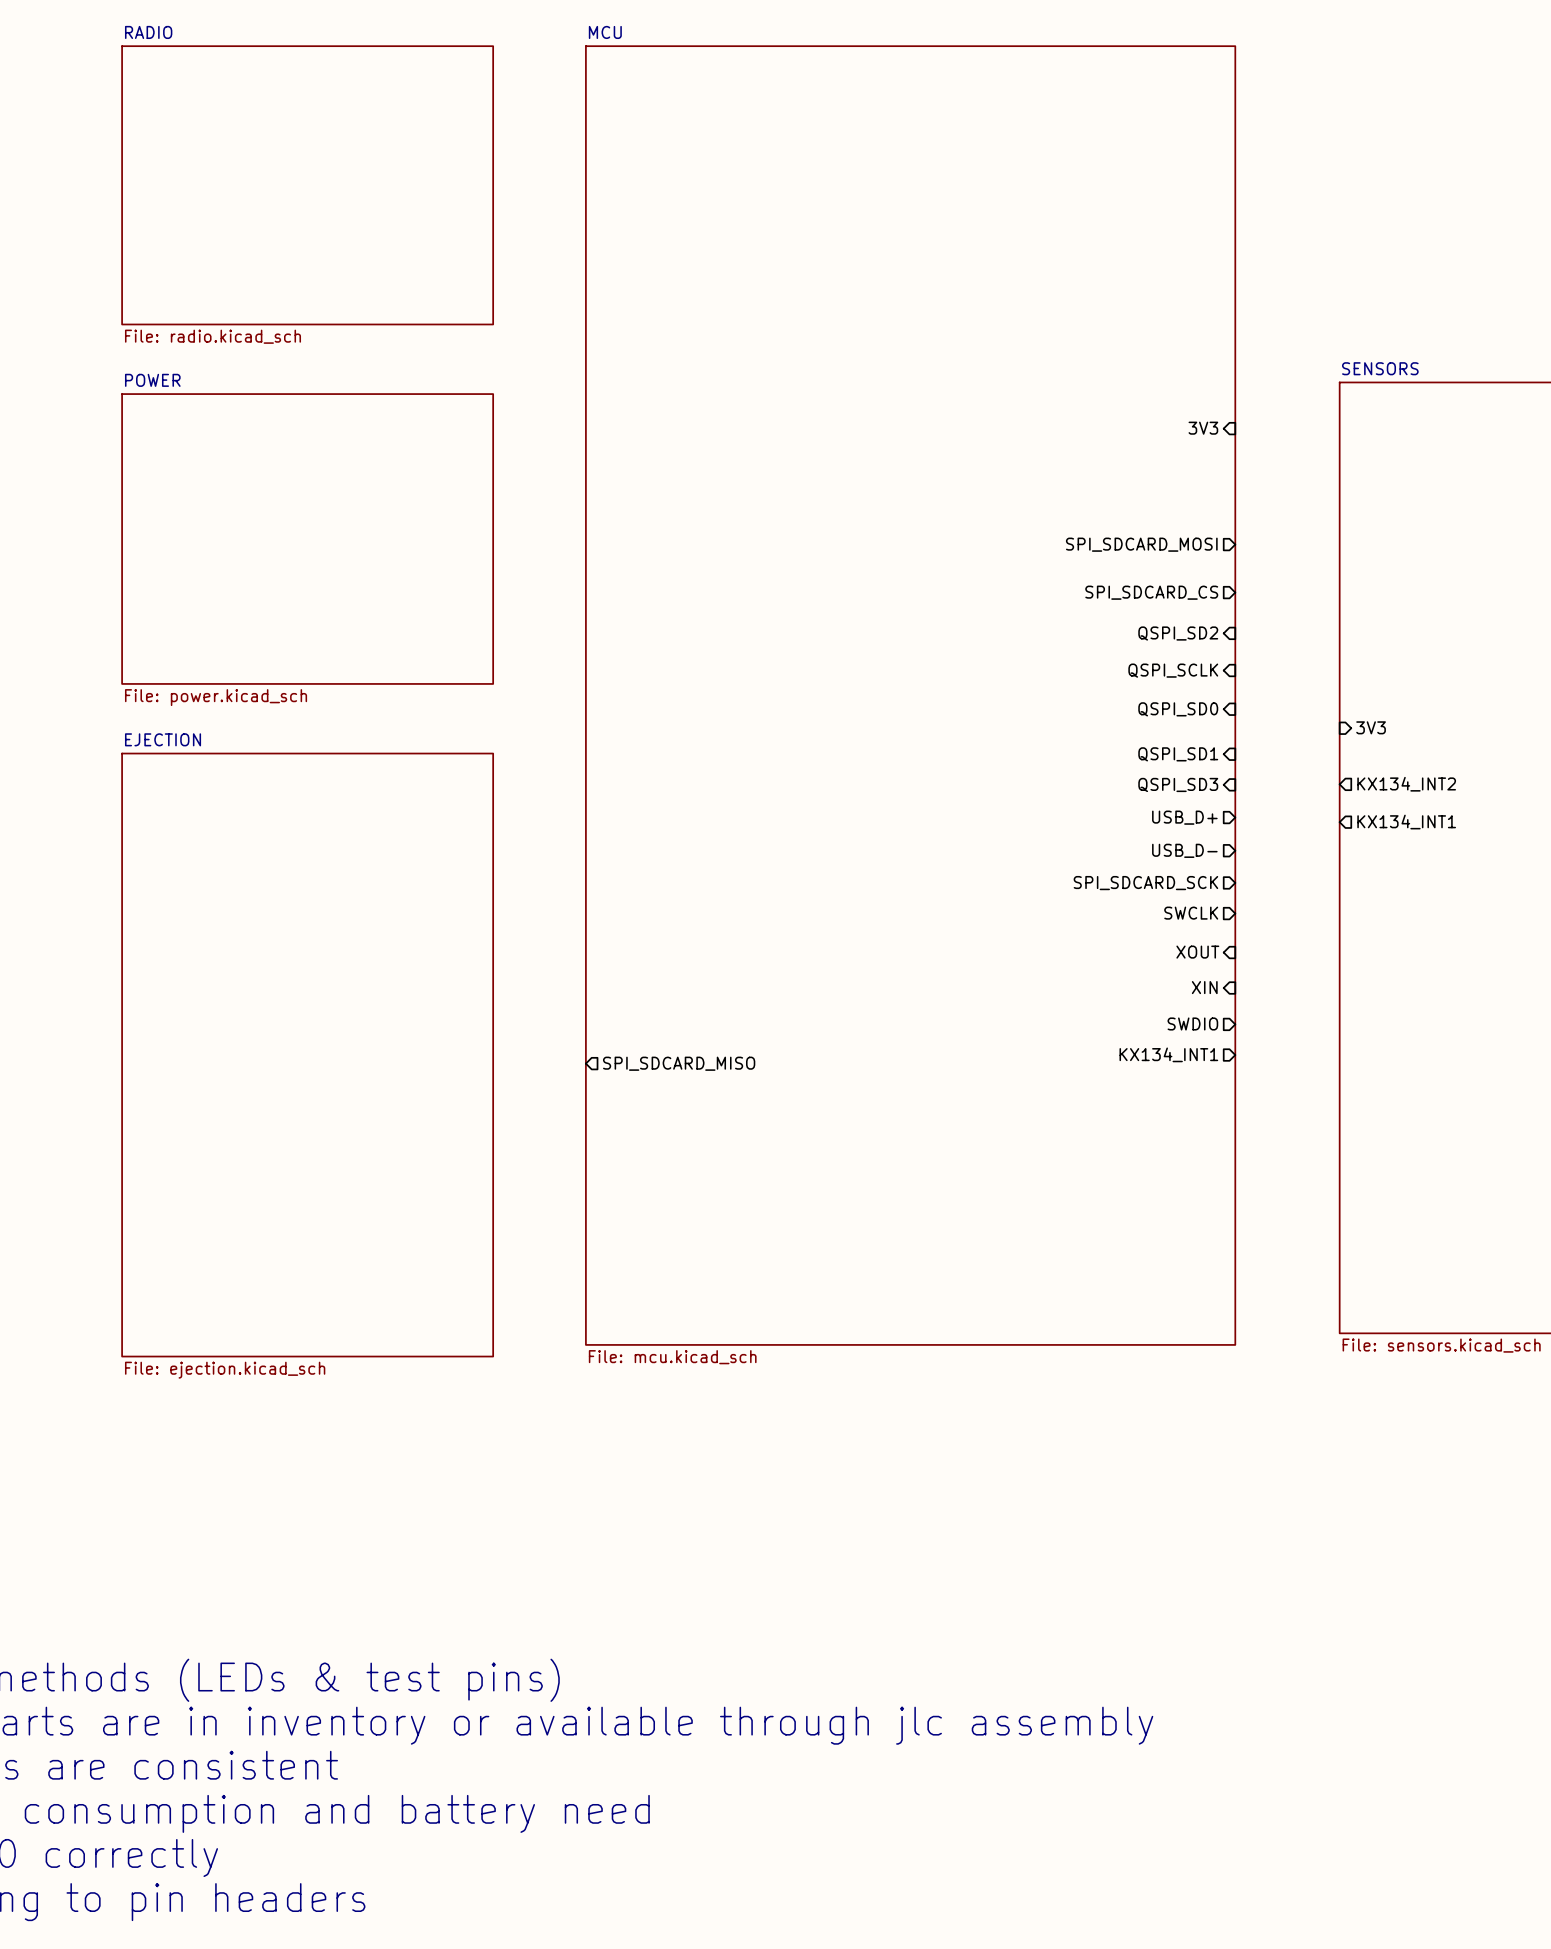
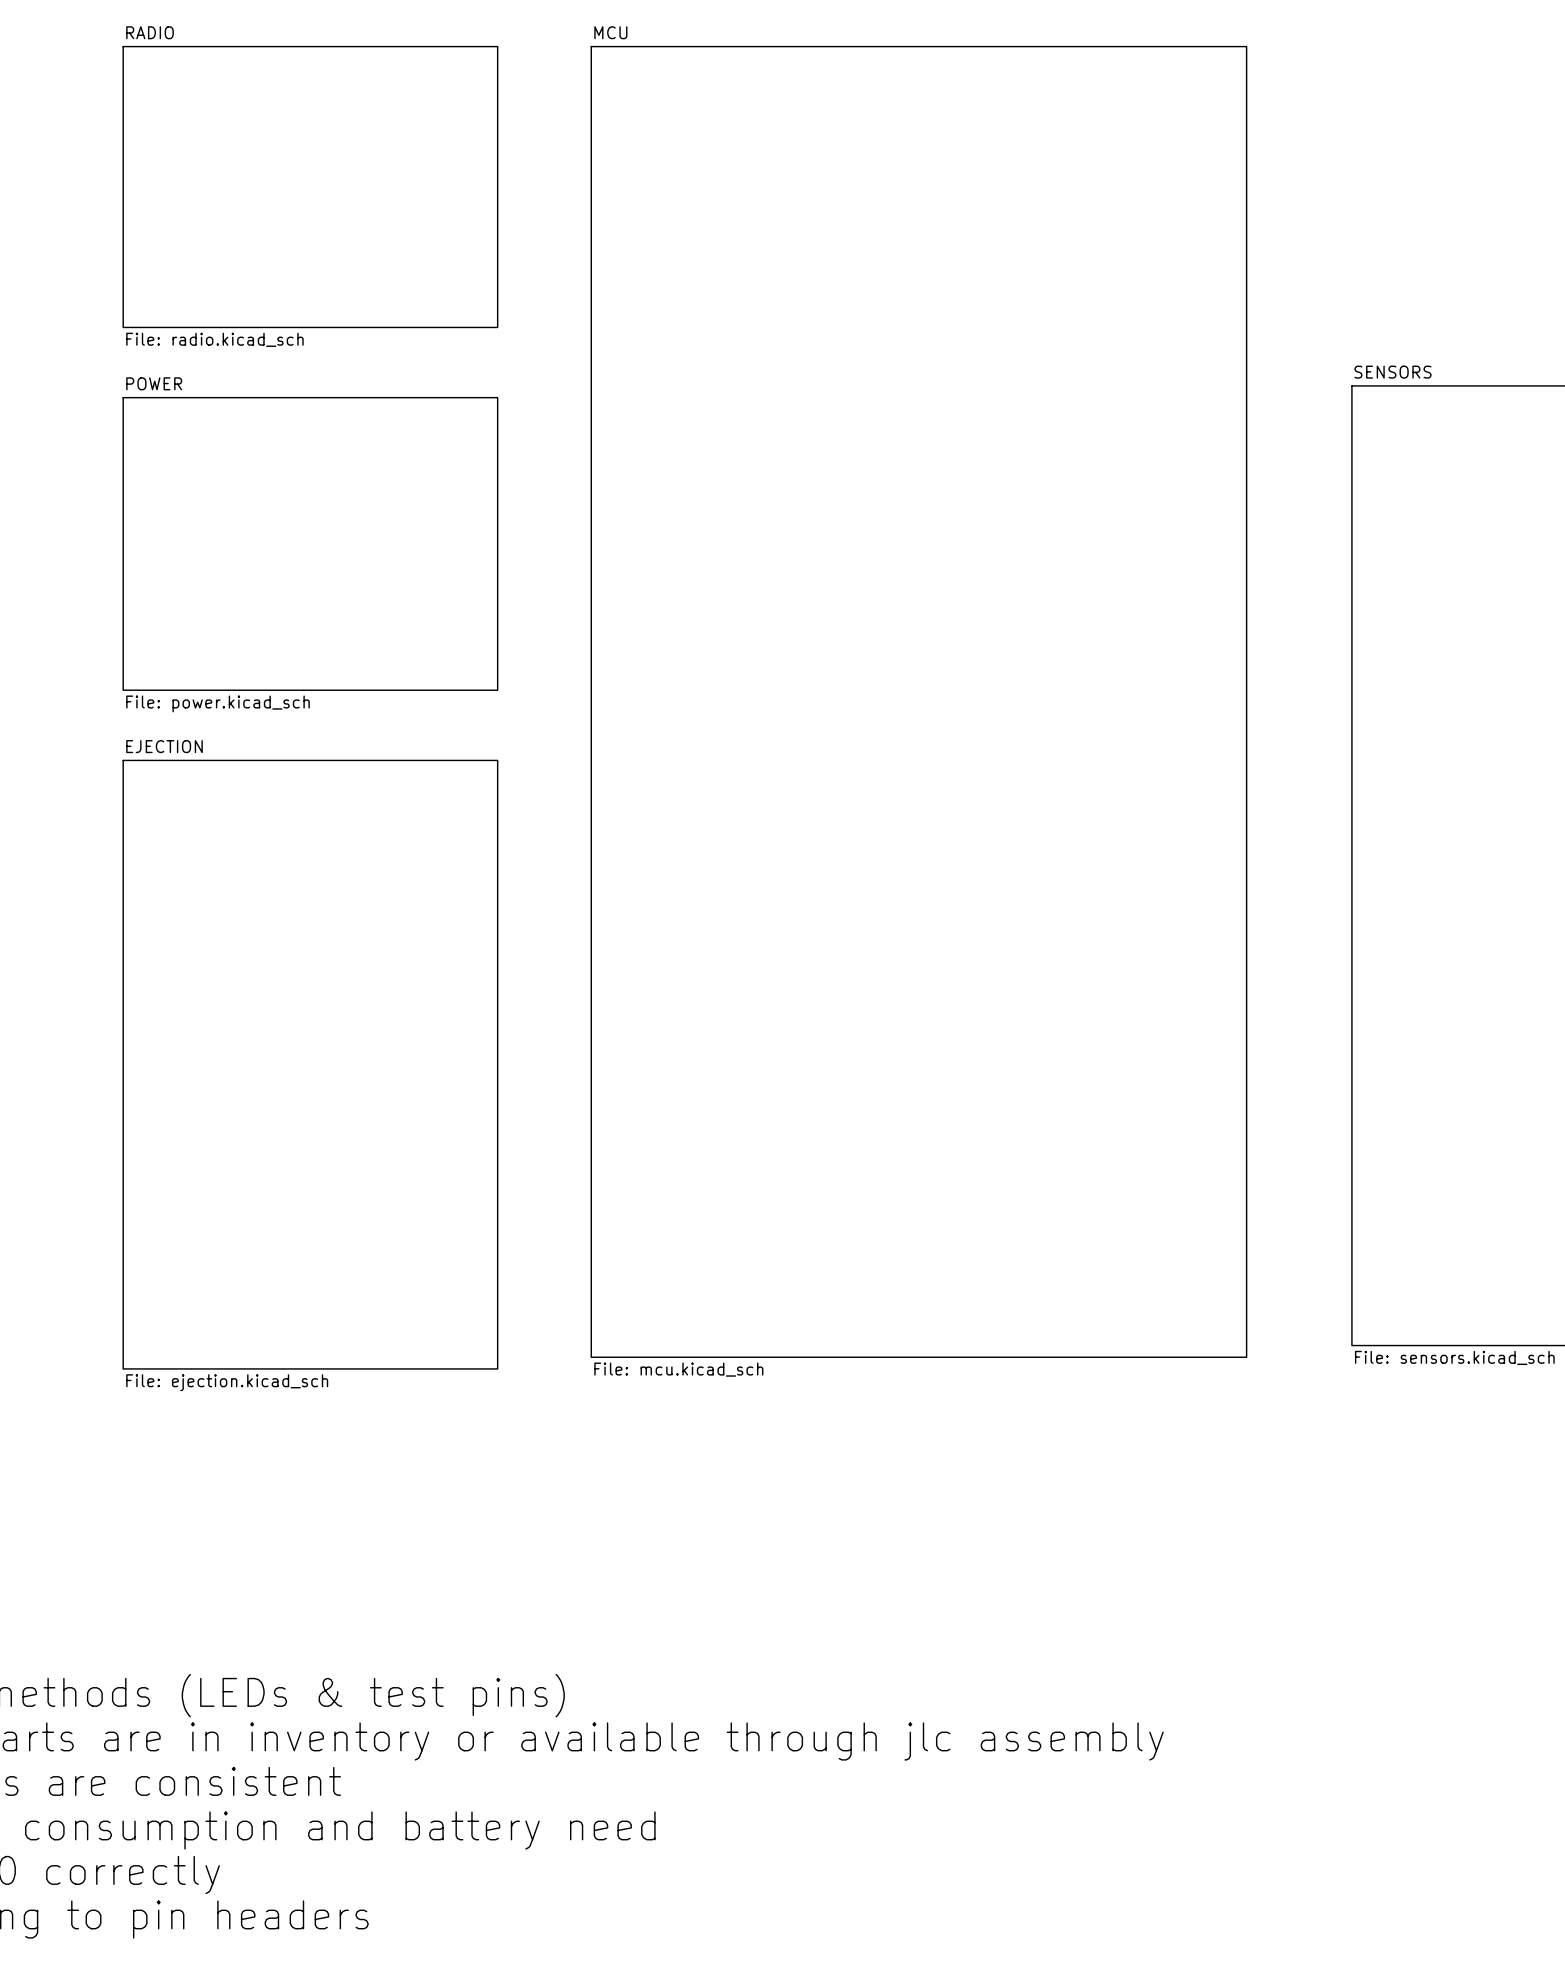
sheet pin: 3V3 (1203, 428) -> none
sheet pin: SPI_SDCARD_MOSI (1141, 544) -> none
sheet pin: SPI_SDCARD_CS (1151, 592) -> none
sheet pin: QSPI_SD2 (1178, 633) -> none
sheet pin: QSPI_SCLK (1173, 670) -> none
sheet pin: QSPI_SD0 (1178, 709) -> none
sheet pin: 3V3 (1371, 727) -> none
sheet pin: QSPI_SD1 (1178, 754) -> none
sheet pin: QSPI_SD3 (1178, 784) -> none
sheet pin: KX134_INT2 (1406, 784) -> none
sheet pin: USB_D+ (1184, 817) -> none
sheet pin: KX134_INT1 (1406, 822) -> none
sheet pin: USB_D- (1184, 850) -> none
sheet pin: SPI_SDCARD_SCK (1145, 883) -> none
sheet pin: SWCLK (1191, 913) -> none
sheet pin: XOUT (1197, 952) -> none
sheet pin: XIN (1204, 987) -> none
sheet pin: SWDIO (1192, 1023) -> none
sheet pin: KX134_INT1 (1168, 1054) -> none
sheet pin: SPI_SDCARD_MISO (679, 1063) -> none

